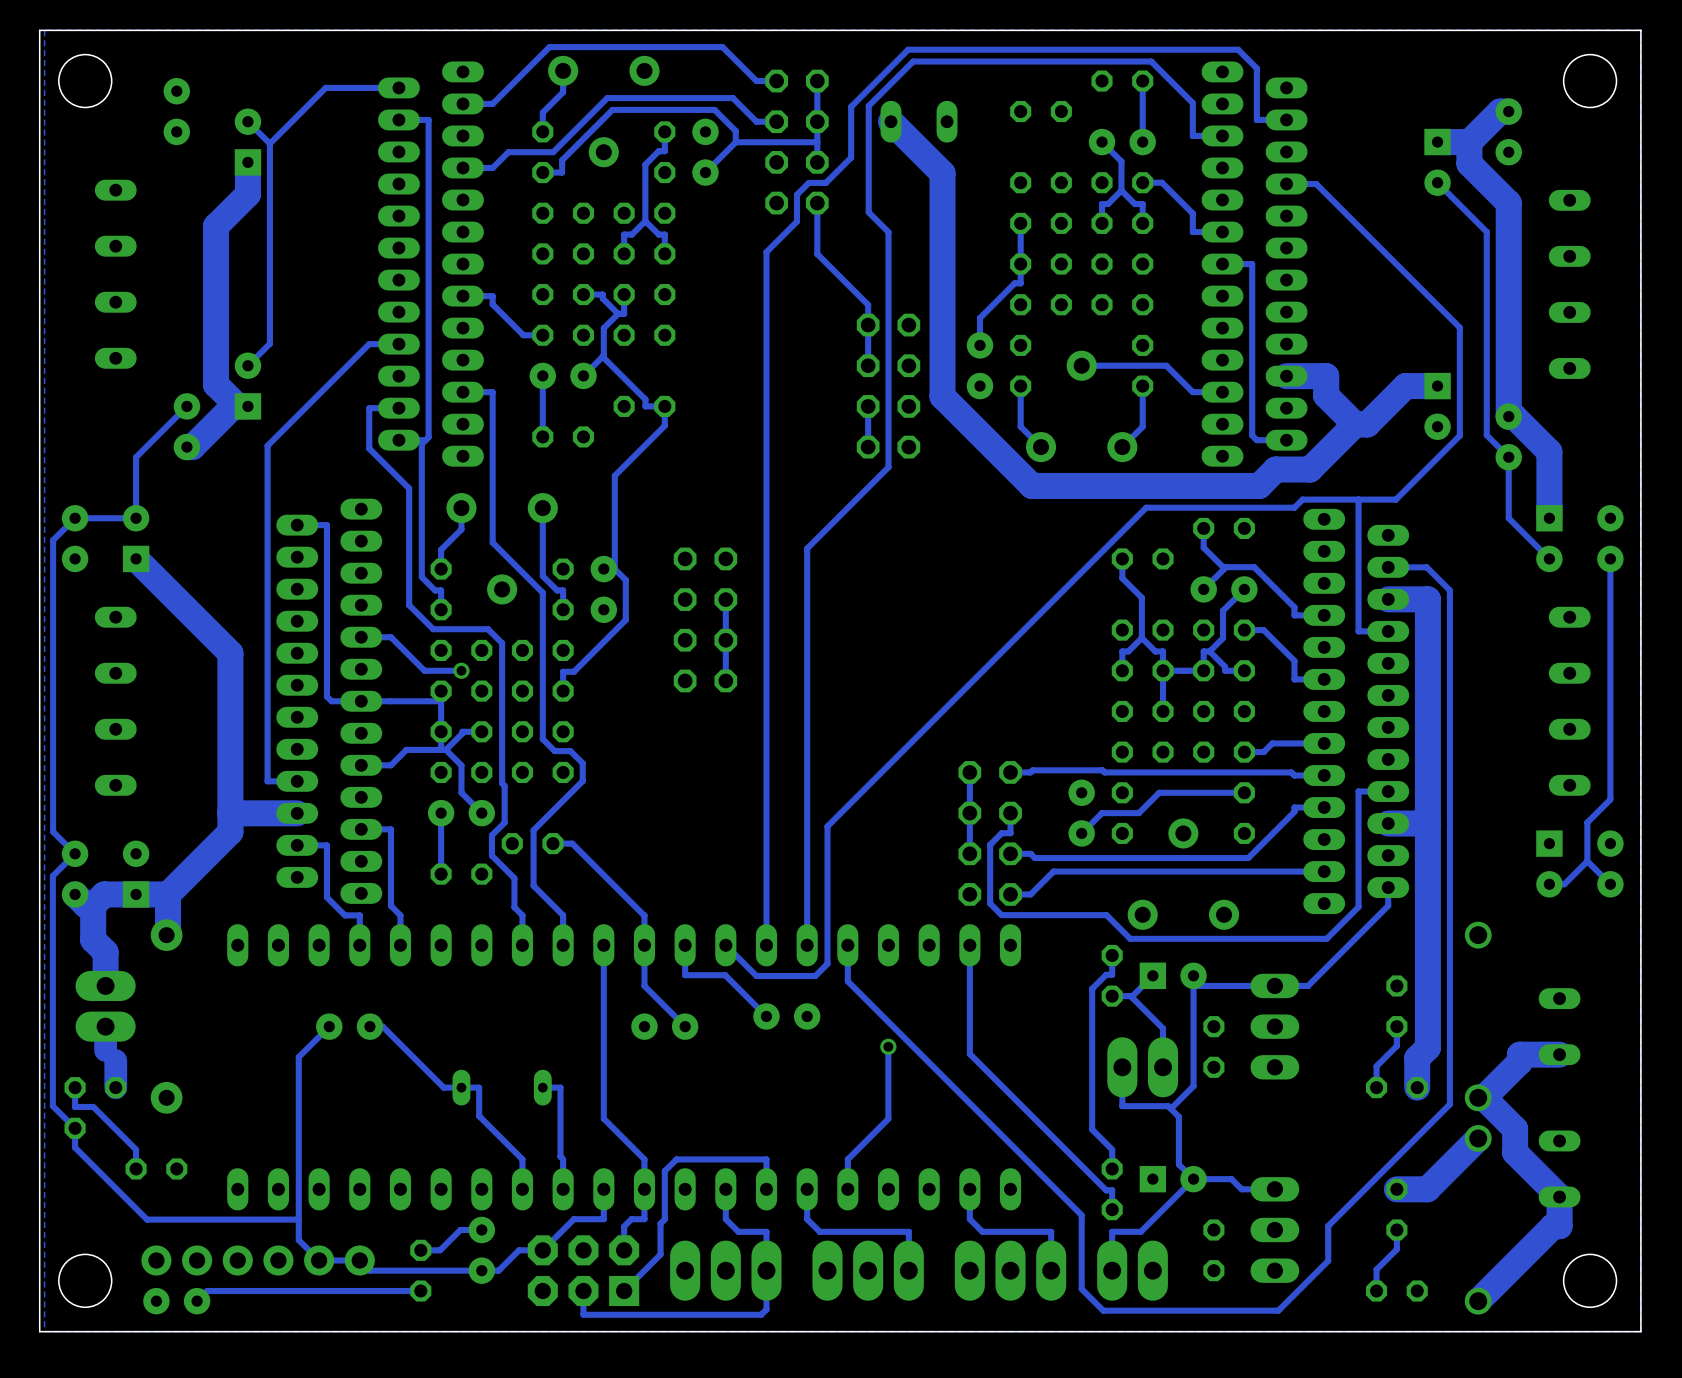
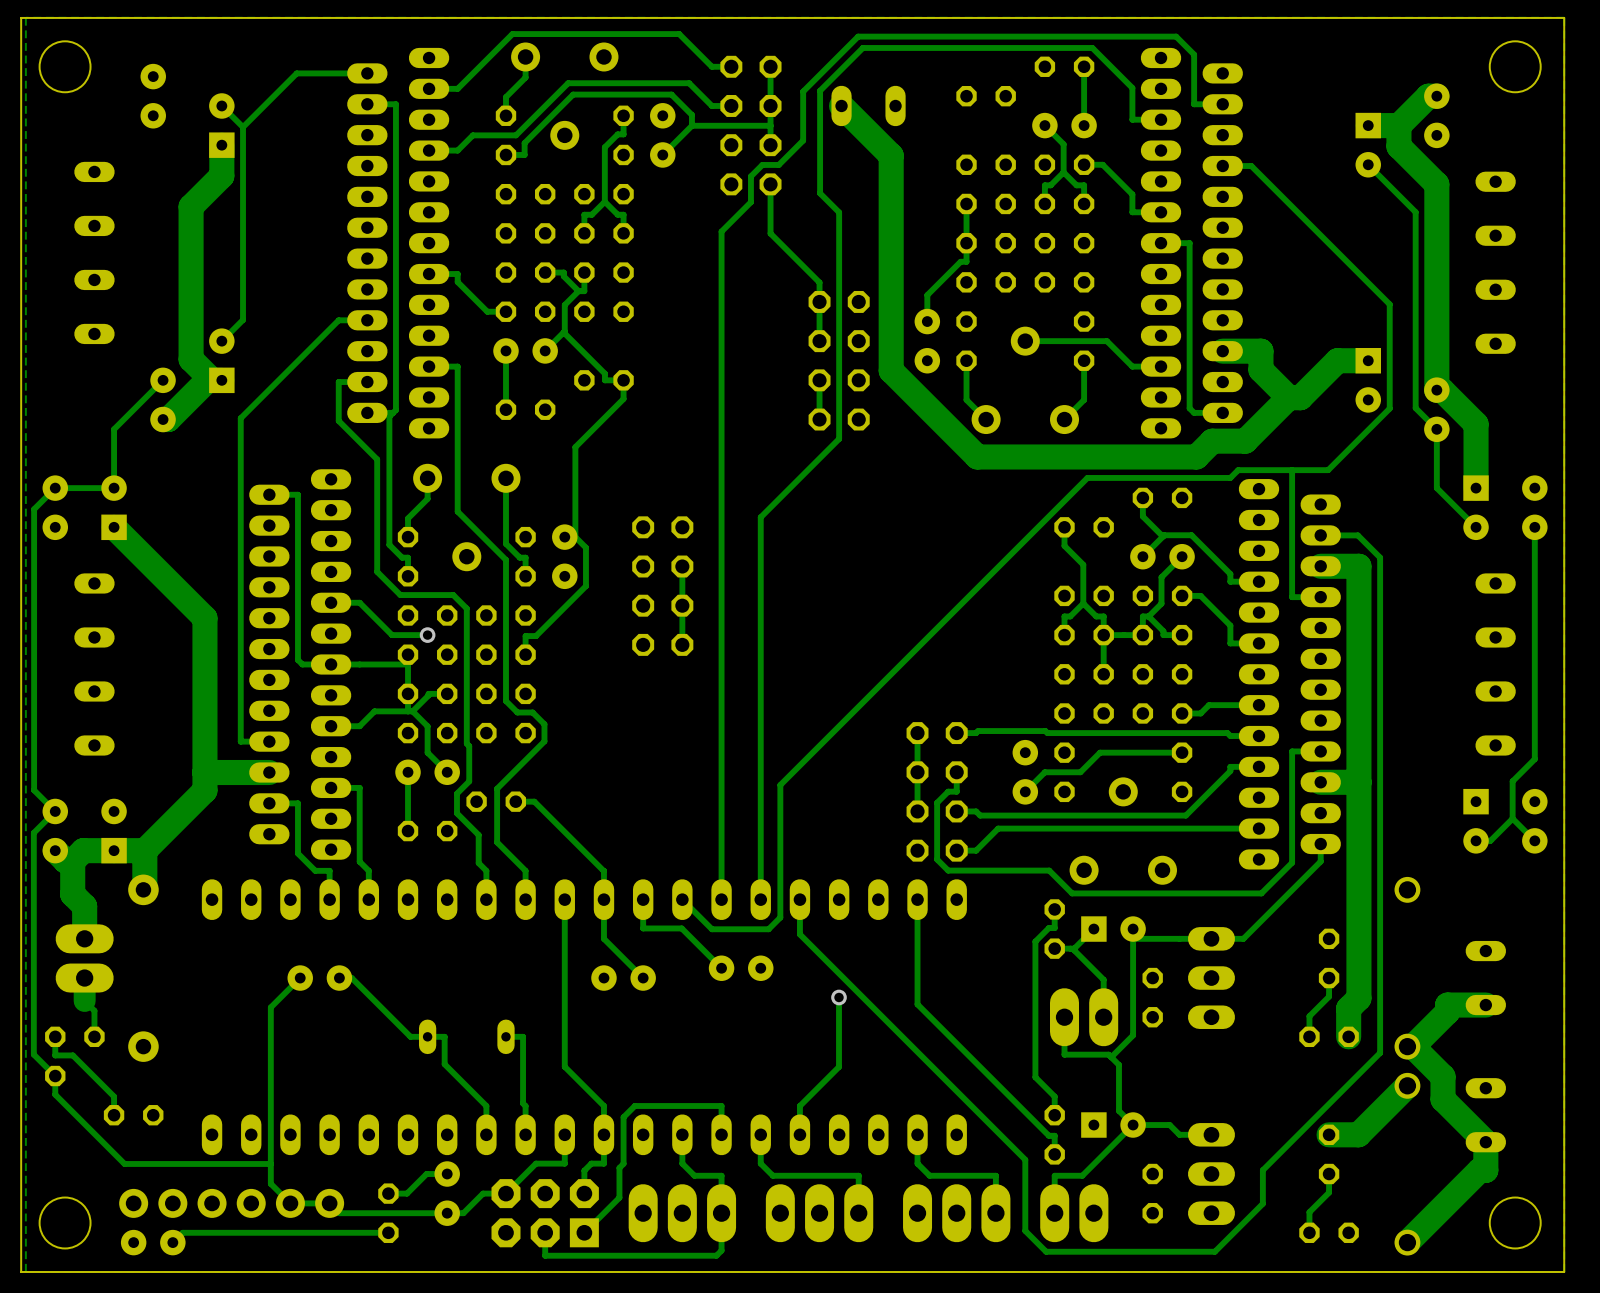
track width: thick (115, 1060) (115, 1087) -> thin (94, 1010) (94, 1036)

